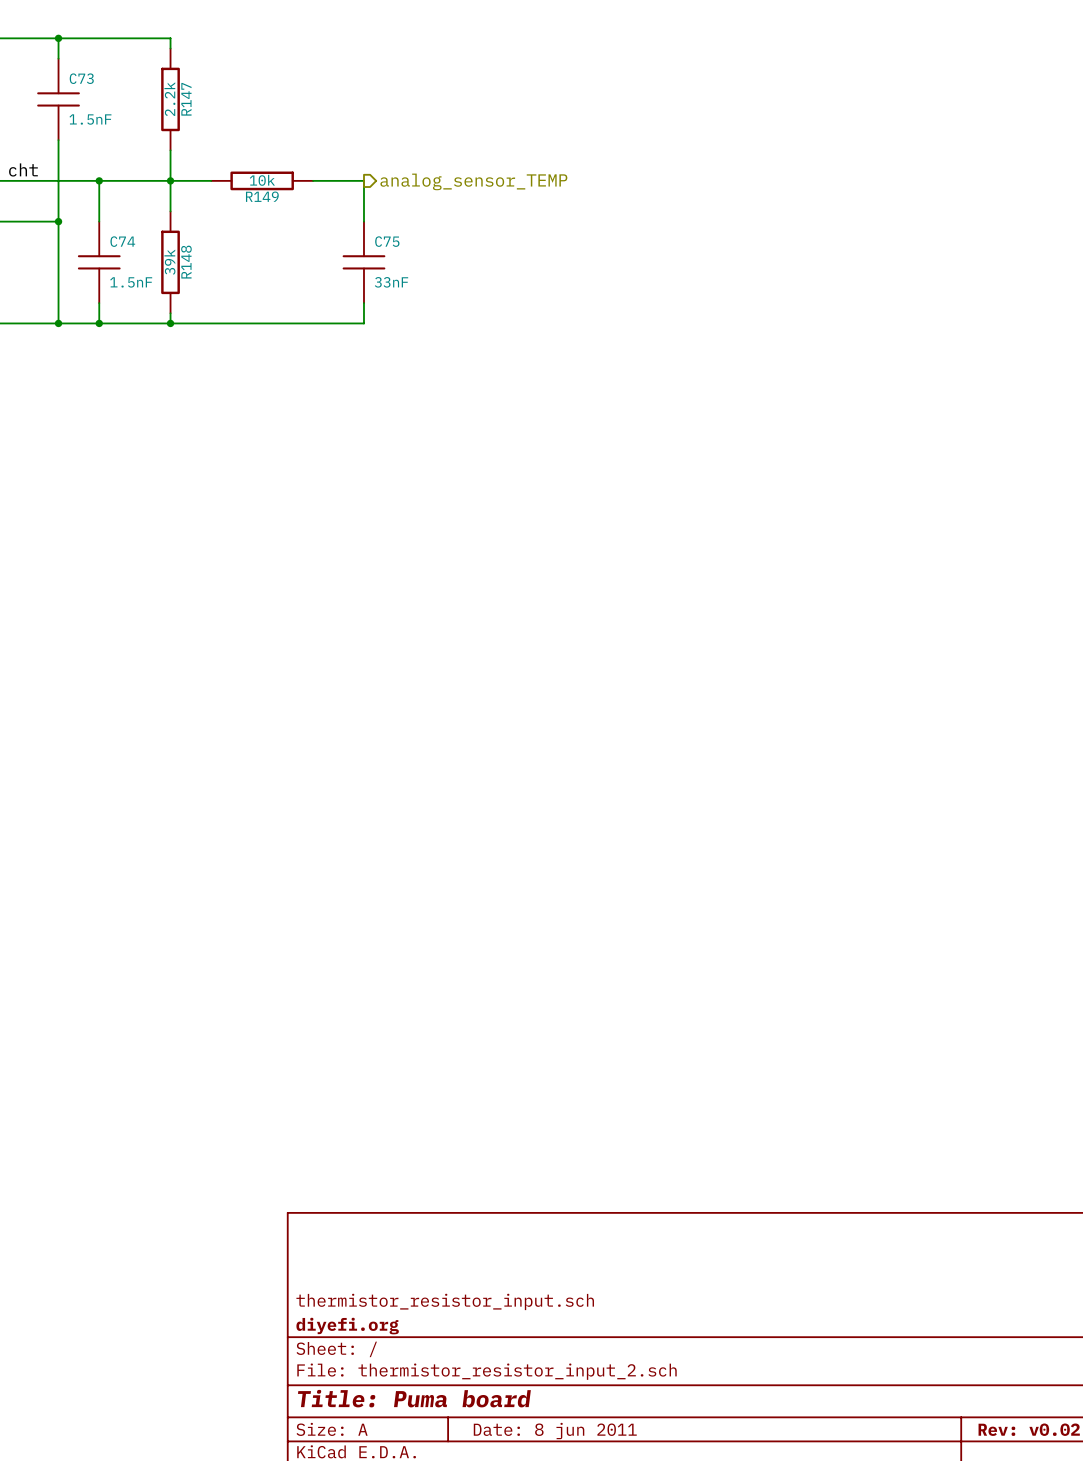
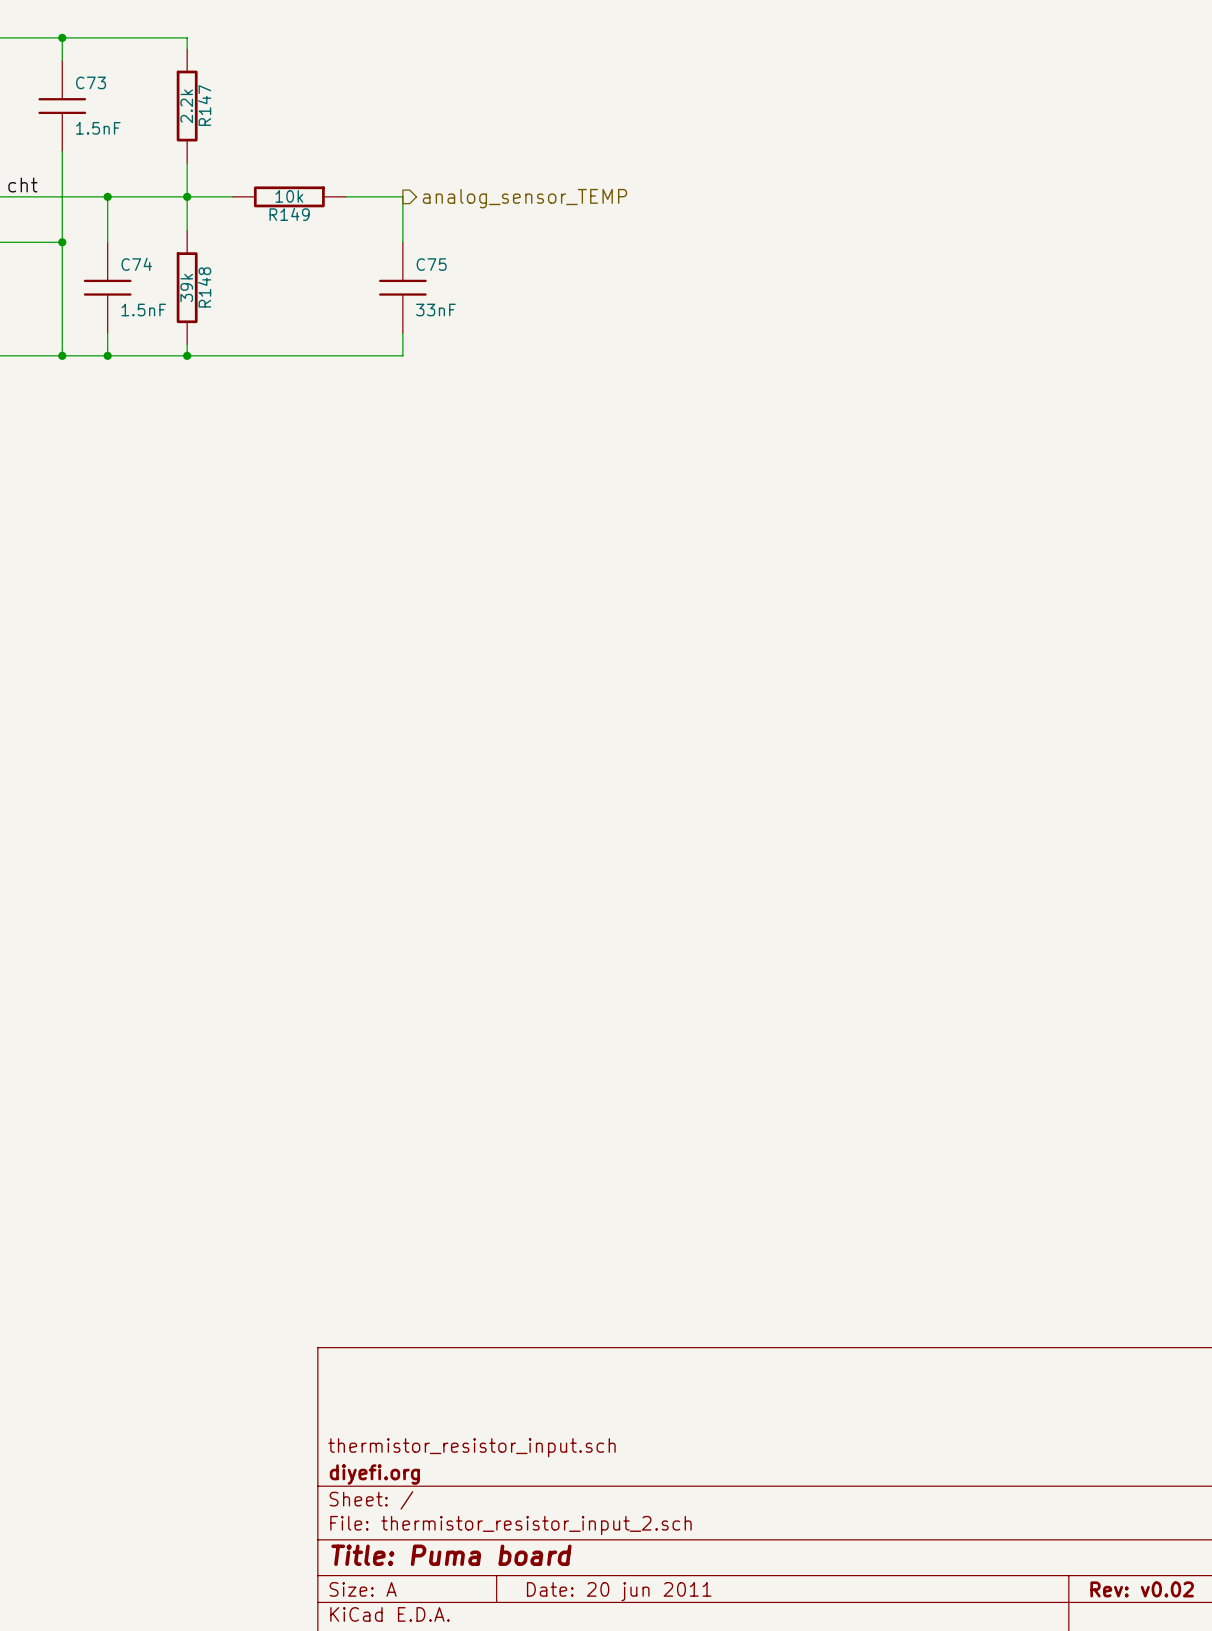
title block: Date: 8 jun 2011 (555, 1431) -> Date: 20 jun 2011 (619, 1591)

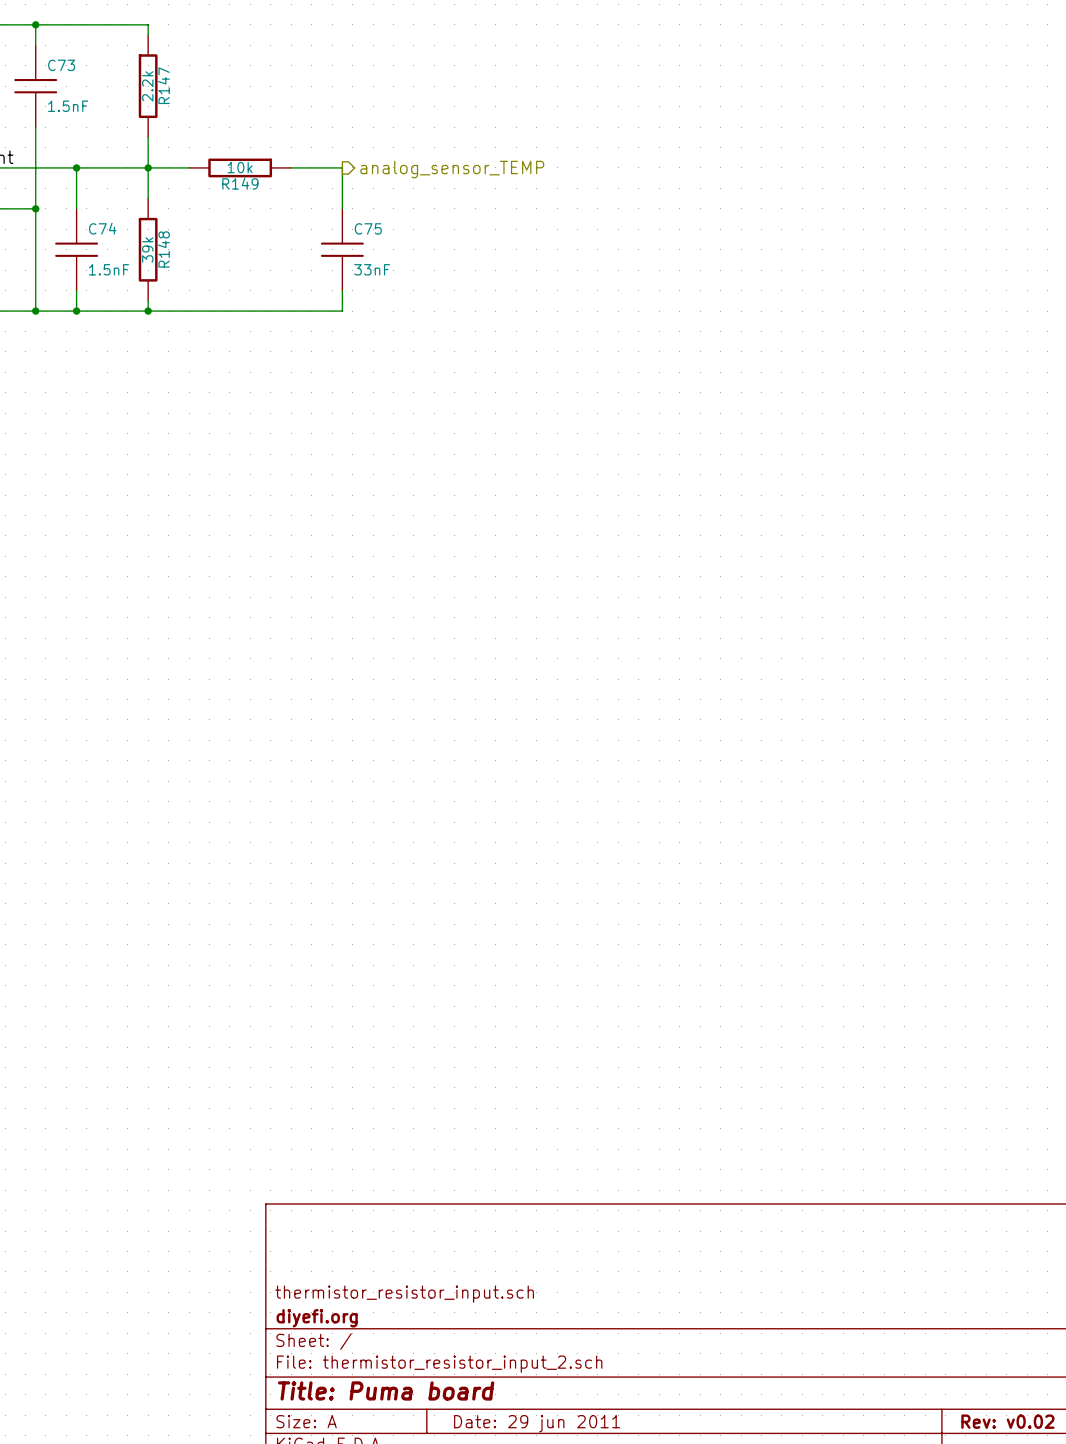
title block: Date: 20 jun 2011 (619, 1591) -> Date: 29 jun 2011 (537, 1423)

